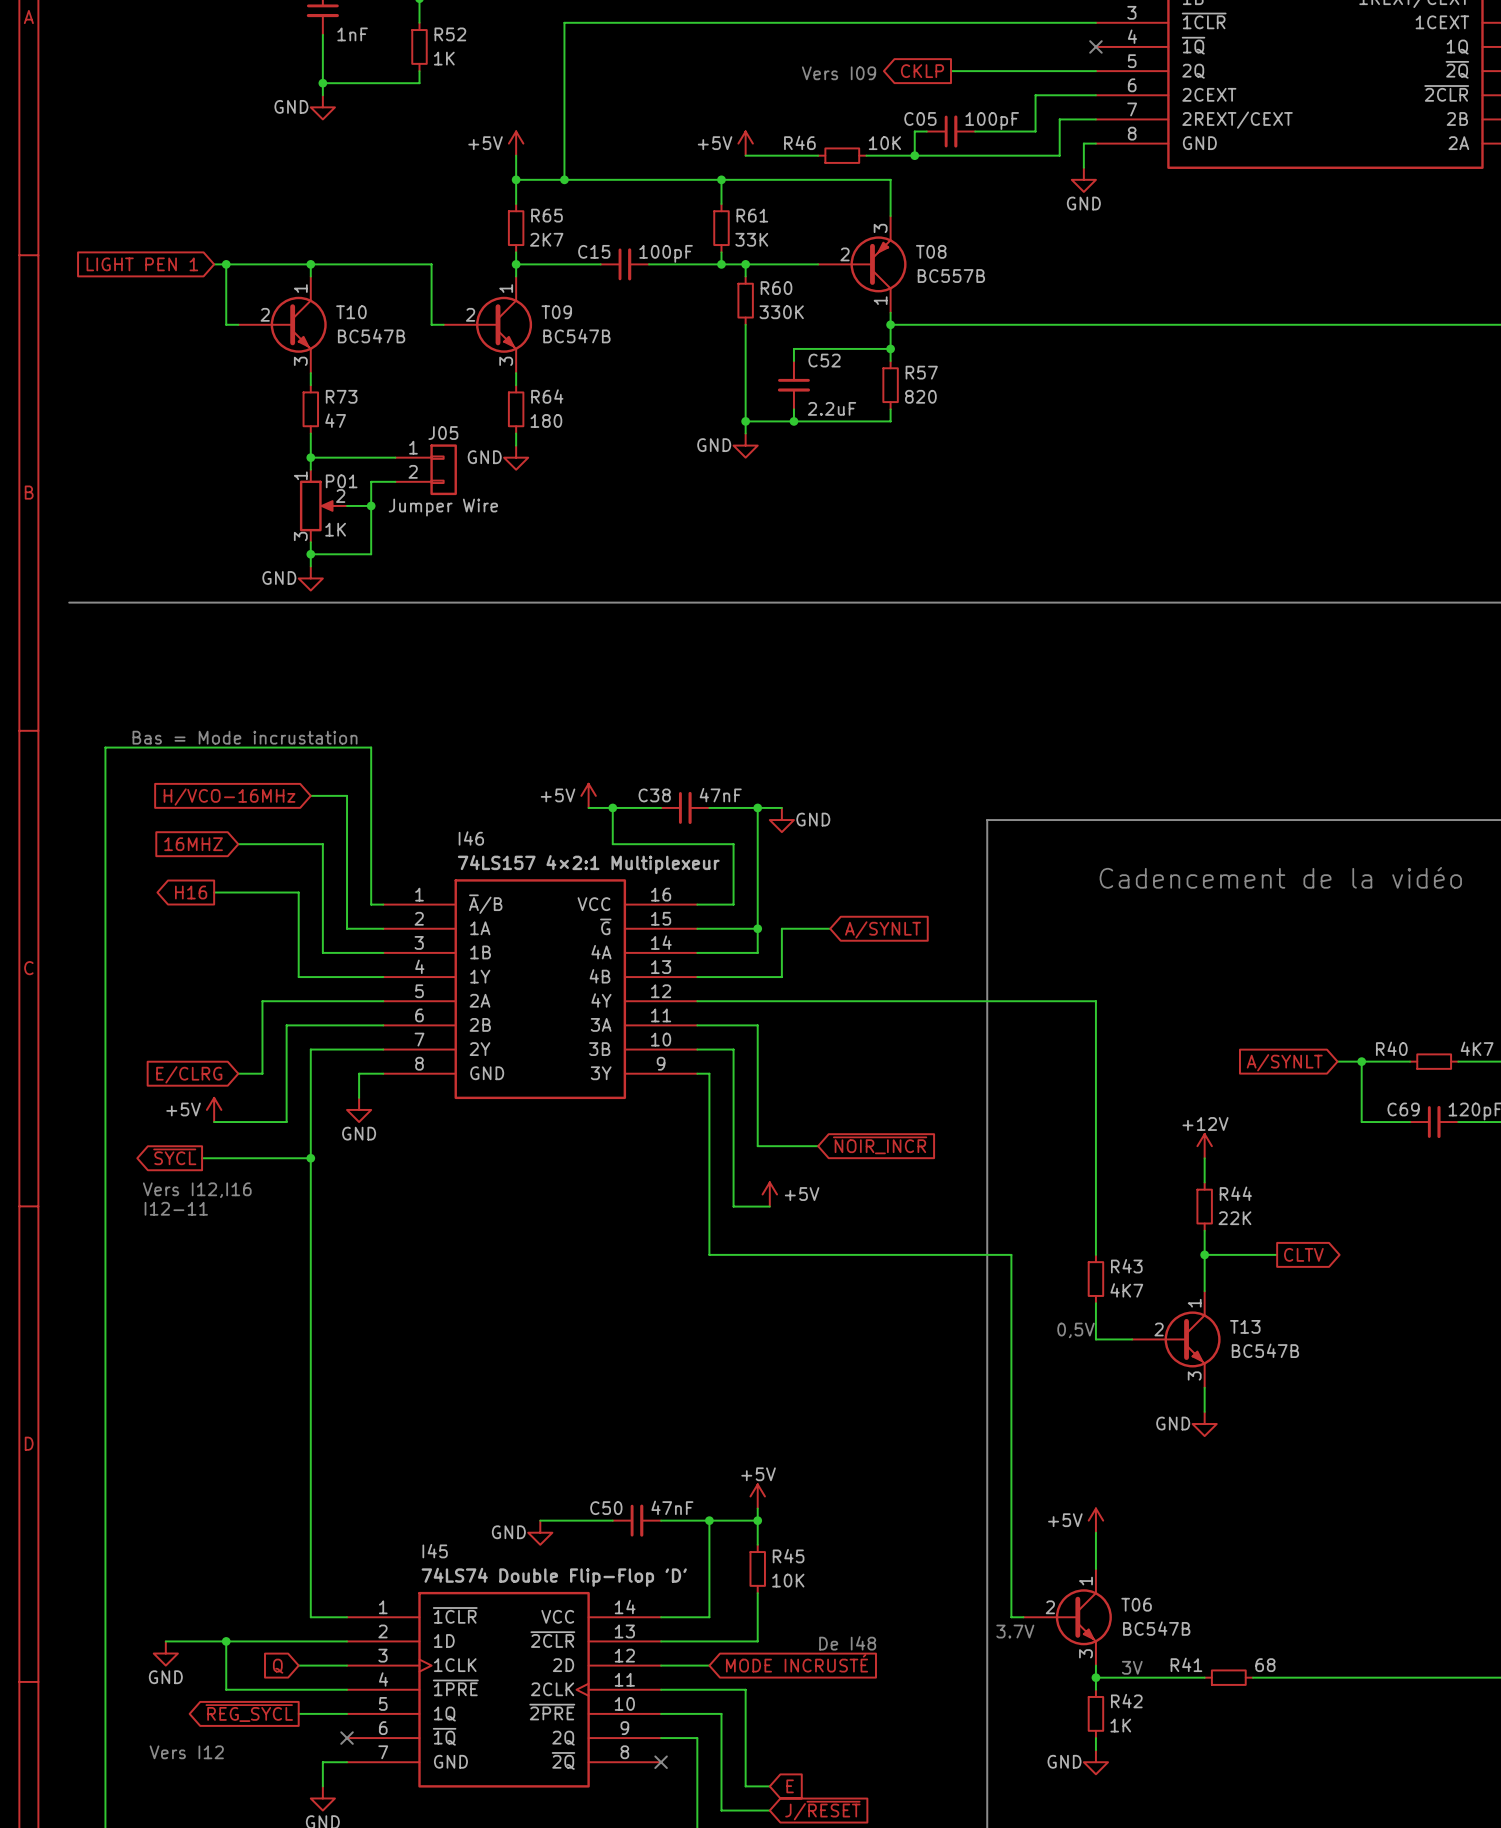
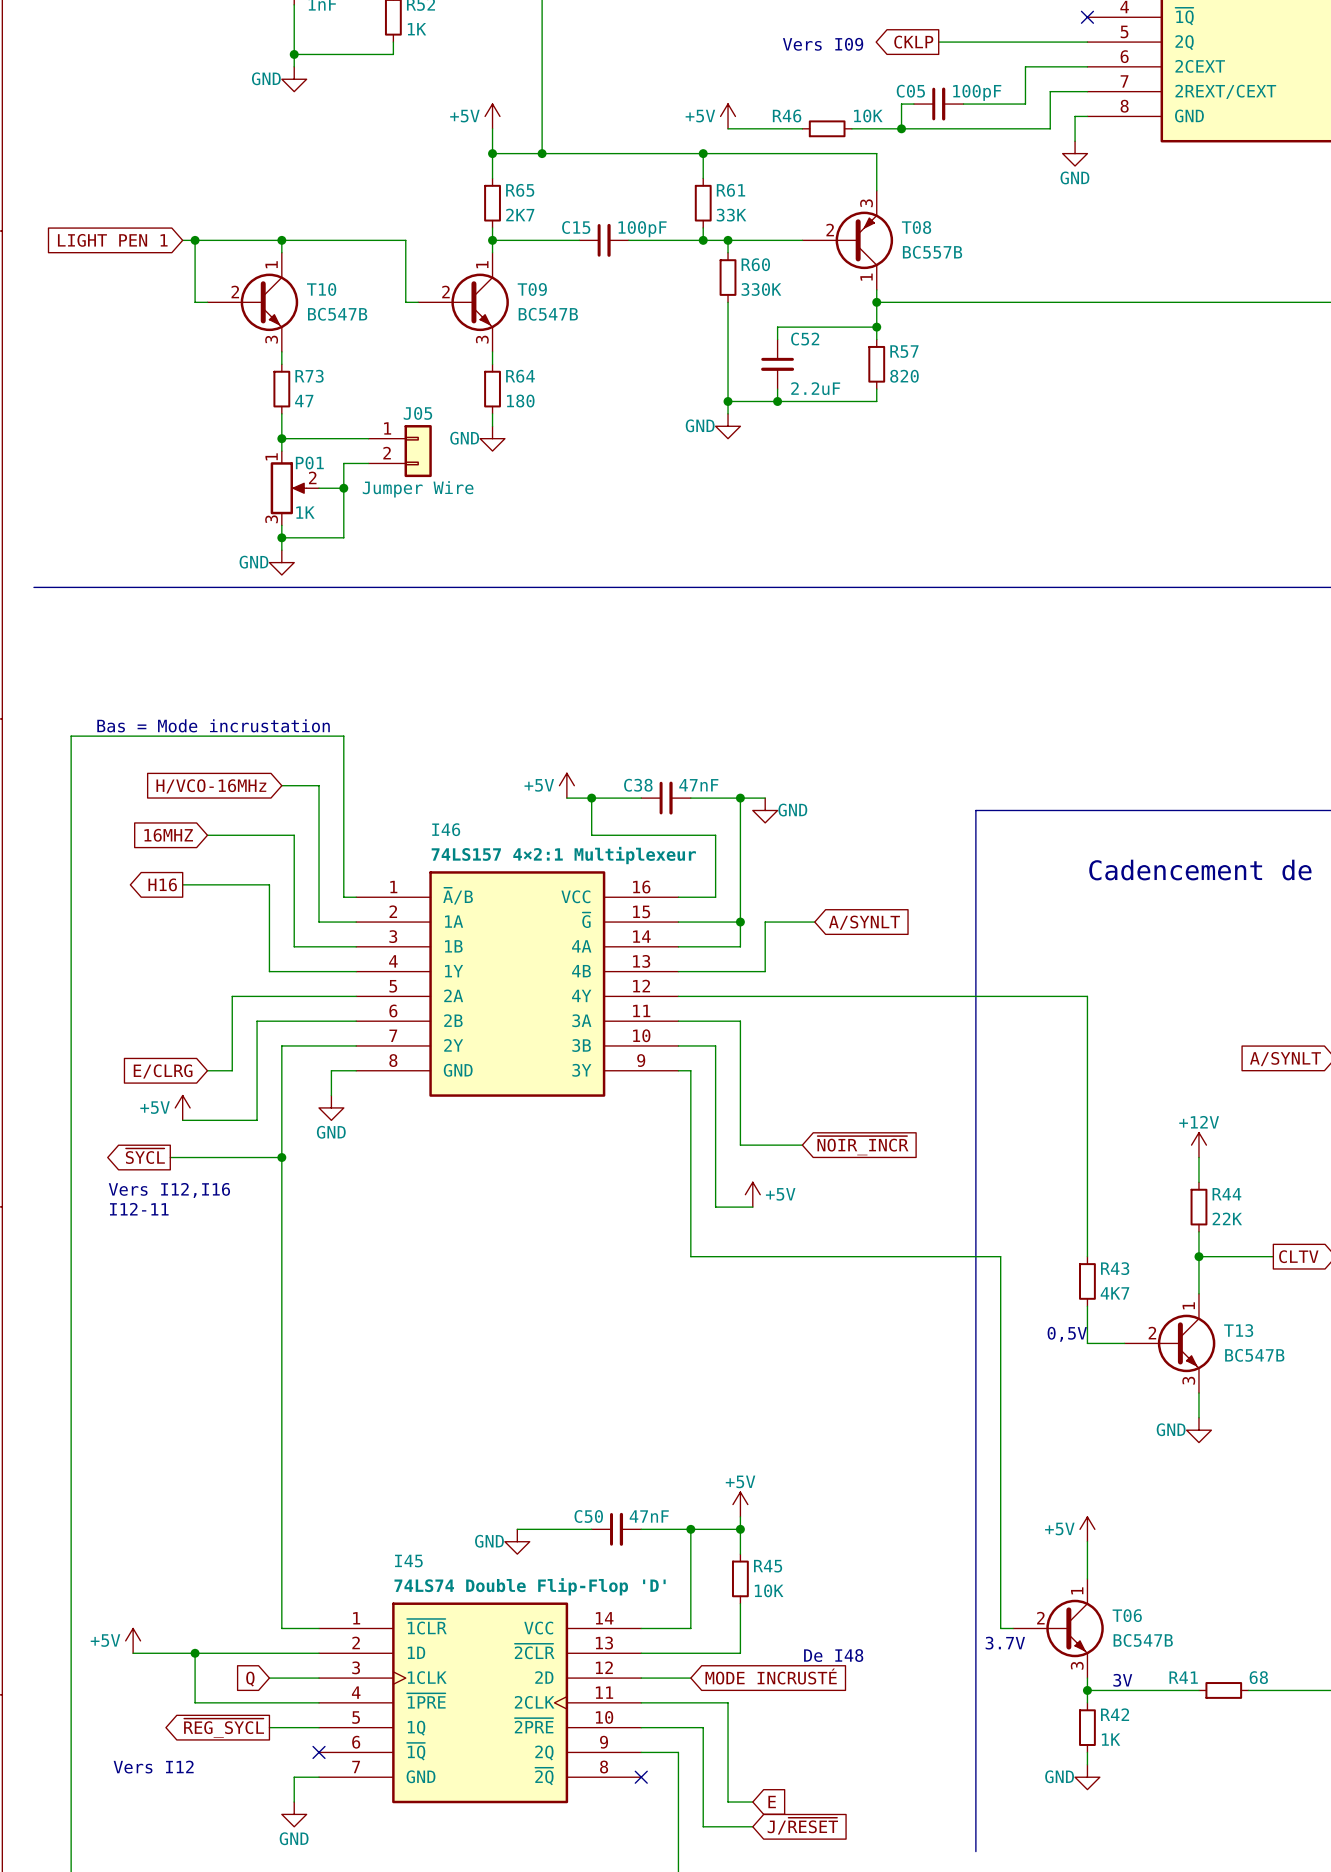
power symbol: none -> +5V (133, 1640)
power symbol: GND (165, 1653) -> none

